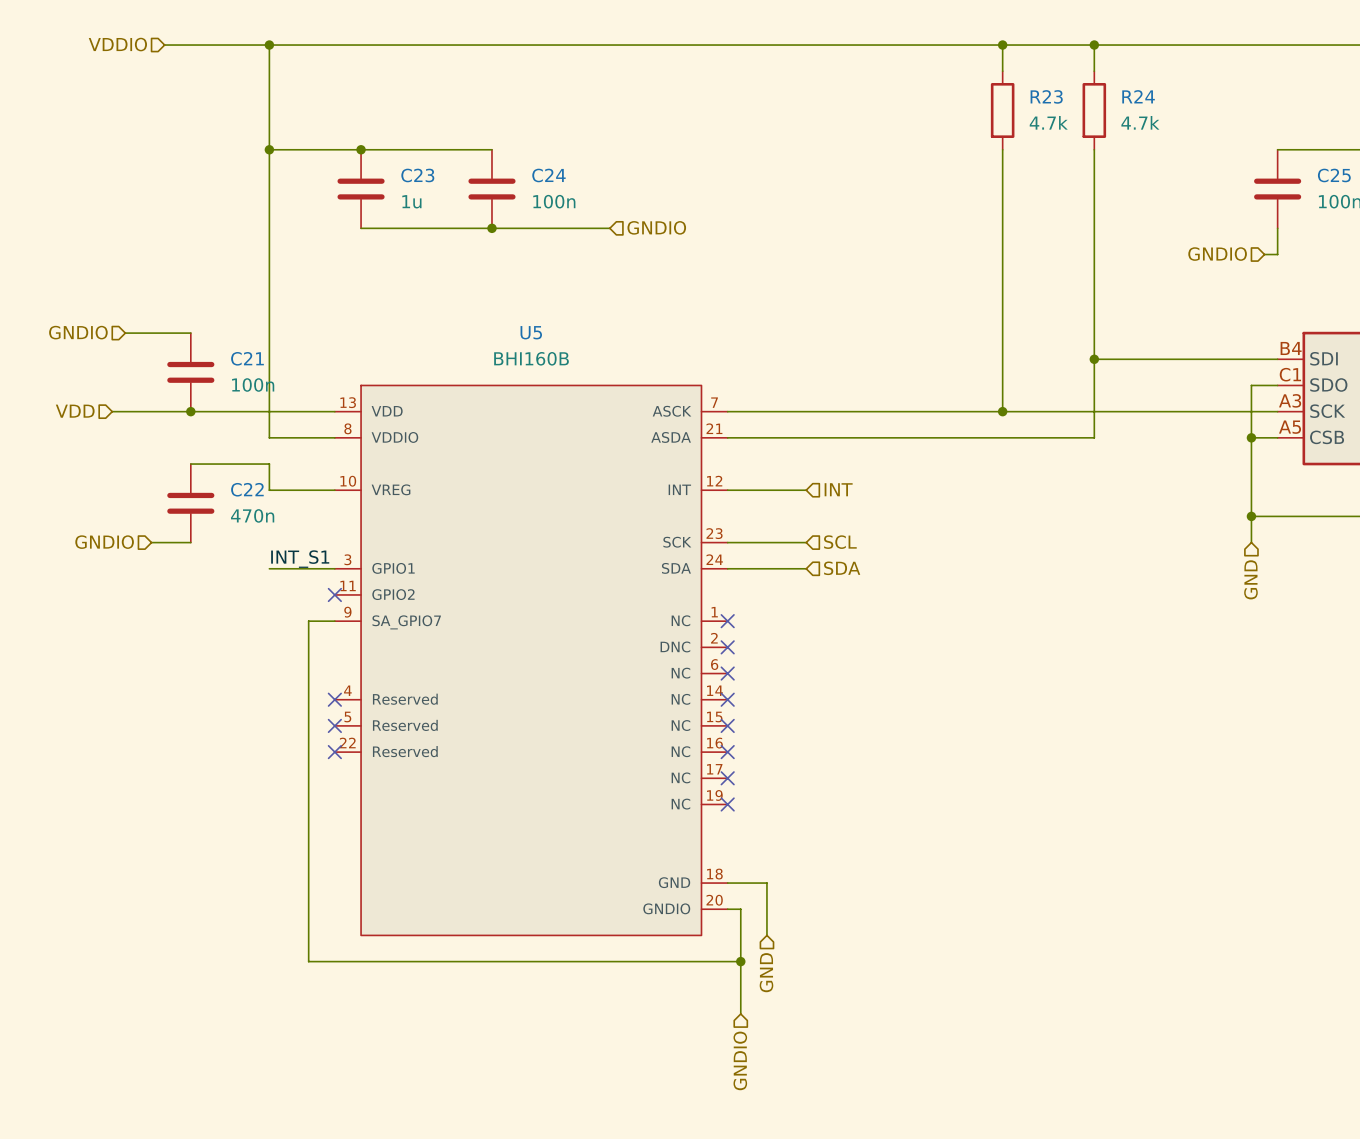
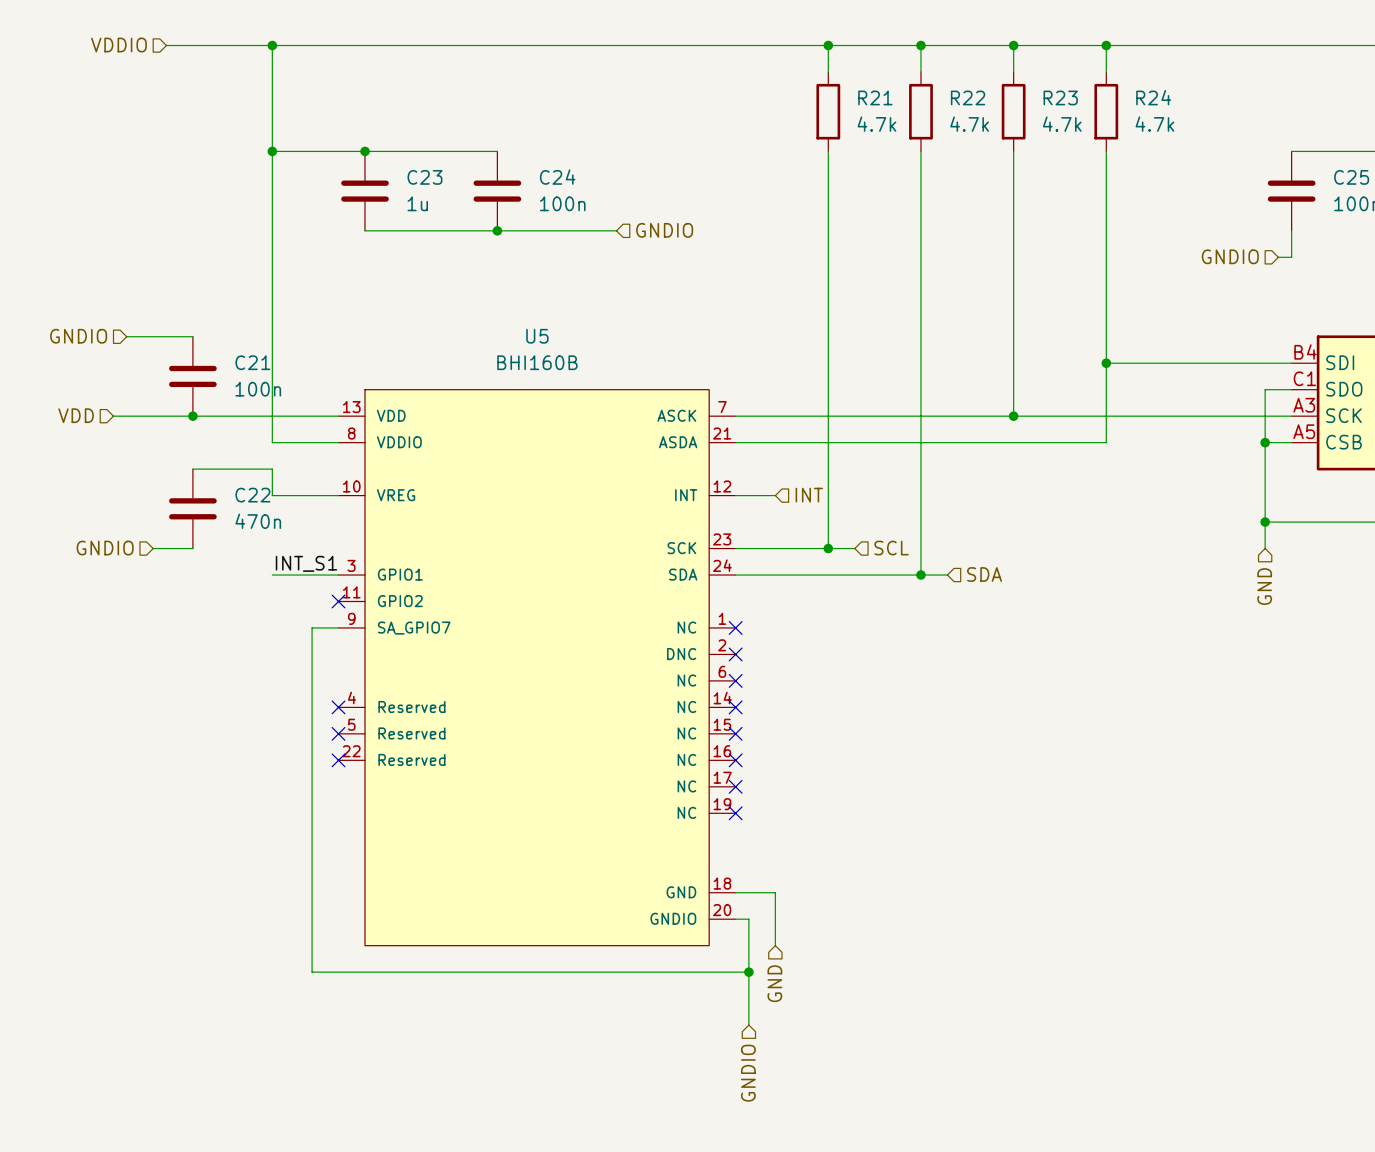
wire: none -> (828, 45) (828, 71)
junction: none -> (828, 45)
wire: none -> (920, 45) (920, 71)
junction: none -> (920, 45)
R21: none -> 4.7k (828, 111)
R22: none -> 4.7k (920, 111)
wire: none -> (828, 151) (828, 548)
wire: none -> (920, 151) (920, 575)
hierarchical label position: INT (838, 489) -> INT (809, 495)
wire: (766, 490) (806, 490) -> (815, 548) (854, 548)
junction: none -> (828, 548)
hierarchical label position: SCL (840, 542) -> SCL (891, 548)
wire: none -> (815, 575) (947, 575)
hierarchical label position: SDA (842, 568) -> SDA (984, 574)
junction: none -> (920, 575)

